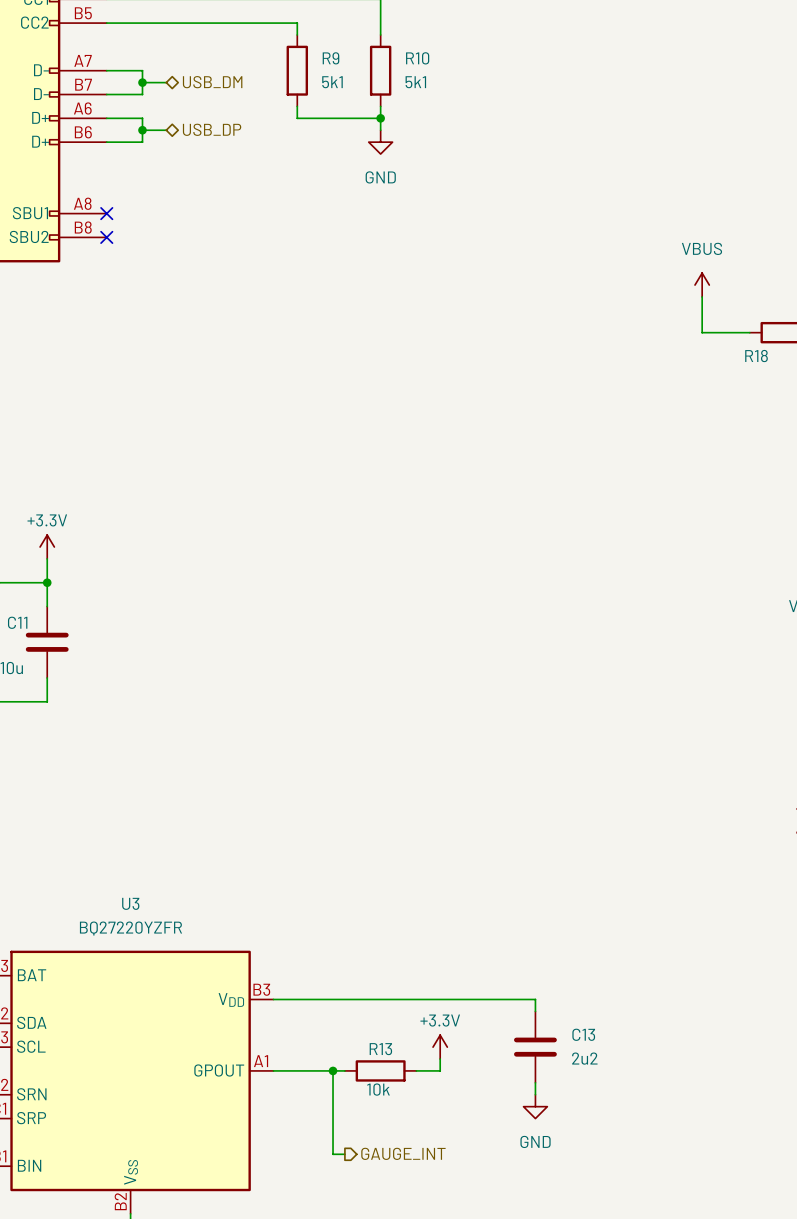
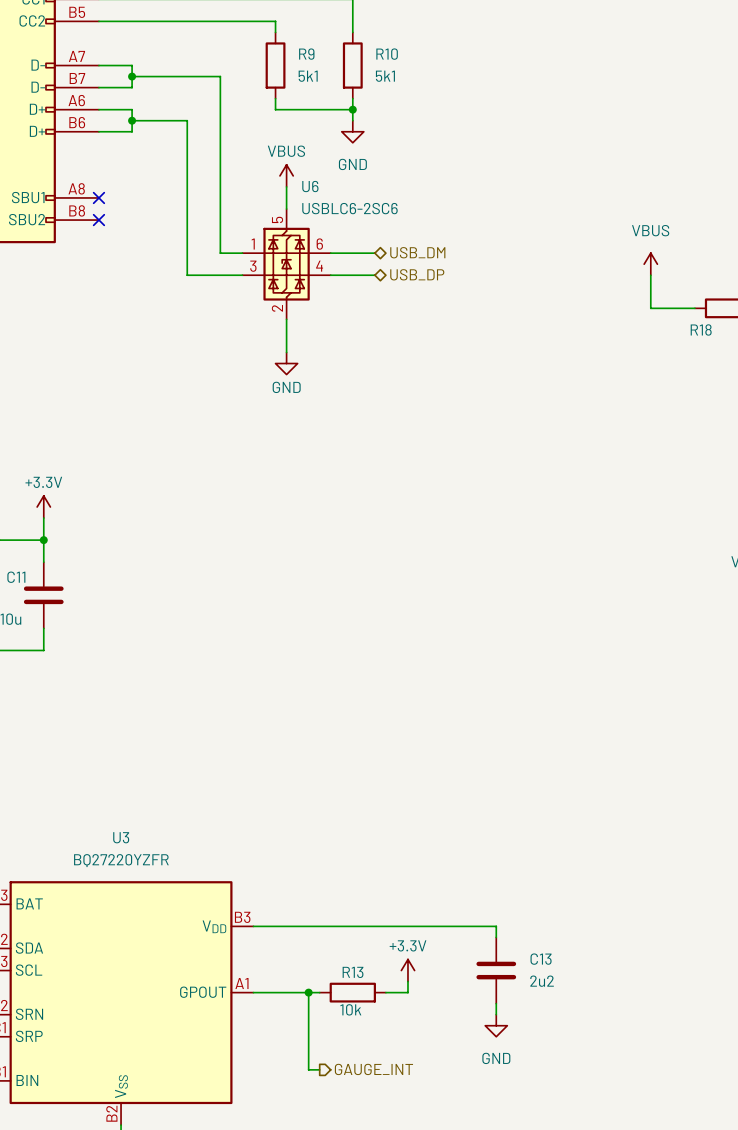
wire: none -> (154, 76) (220, 76) (220, 253) (242, 253)
hierarchical label: USB_DM (212, 82) -> none
hierarchical label: USB_DP (212, 129) -> none
wire: none -> (154, 120) (187, 120) (187, 275) (242, 275)
power symbol: none -> VBUS (286, 175)
wire: none -> (286, 186) (286, 209)
hierarchical label: none -> USB_DM (417, 252)
wire: none -> (330, 253) (374, 253)
U6: none -> USBLC6-2SC6 (286, 264)
wire: none -> (330, 275) (374, 275)
hierarchical label: none -> USB_DP (417, 274)
wire: none -> (286, 319) (286, 352)
power symbol: none -> GND (286, 363)

